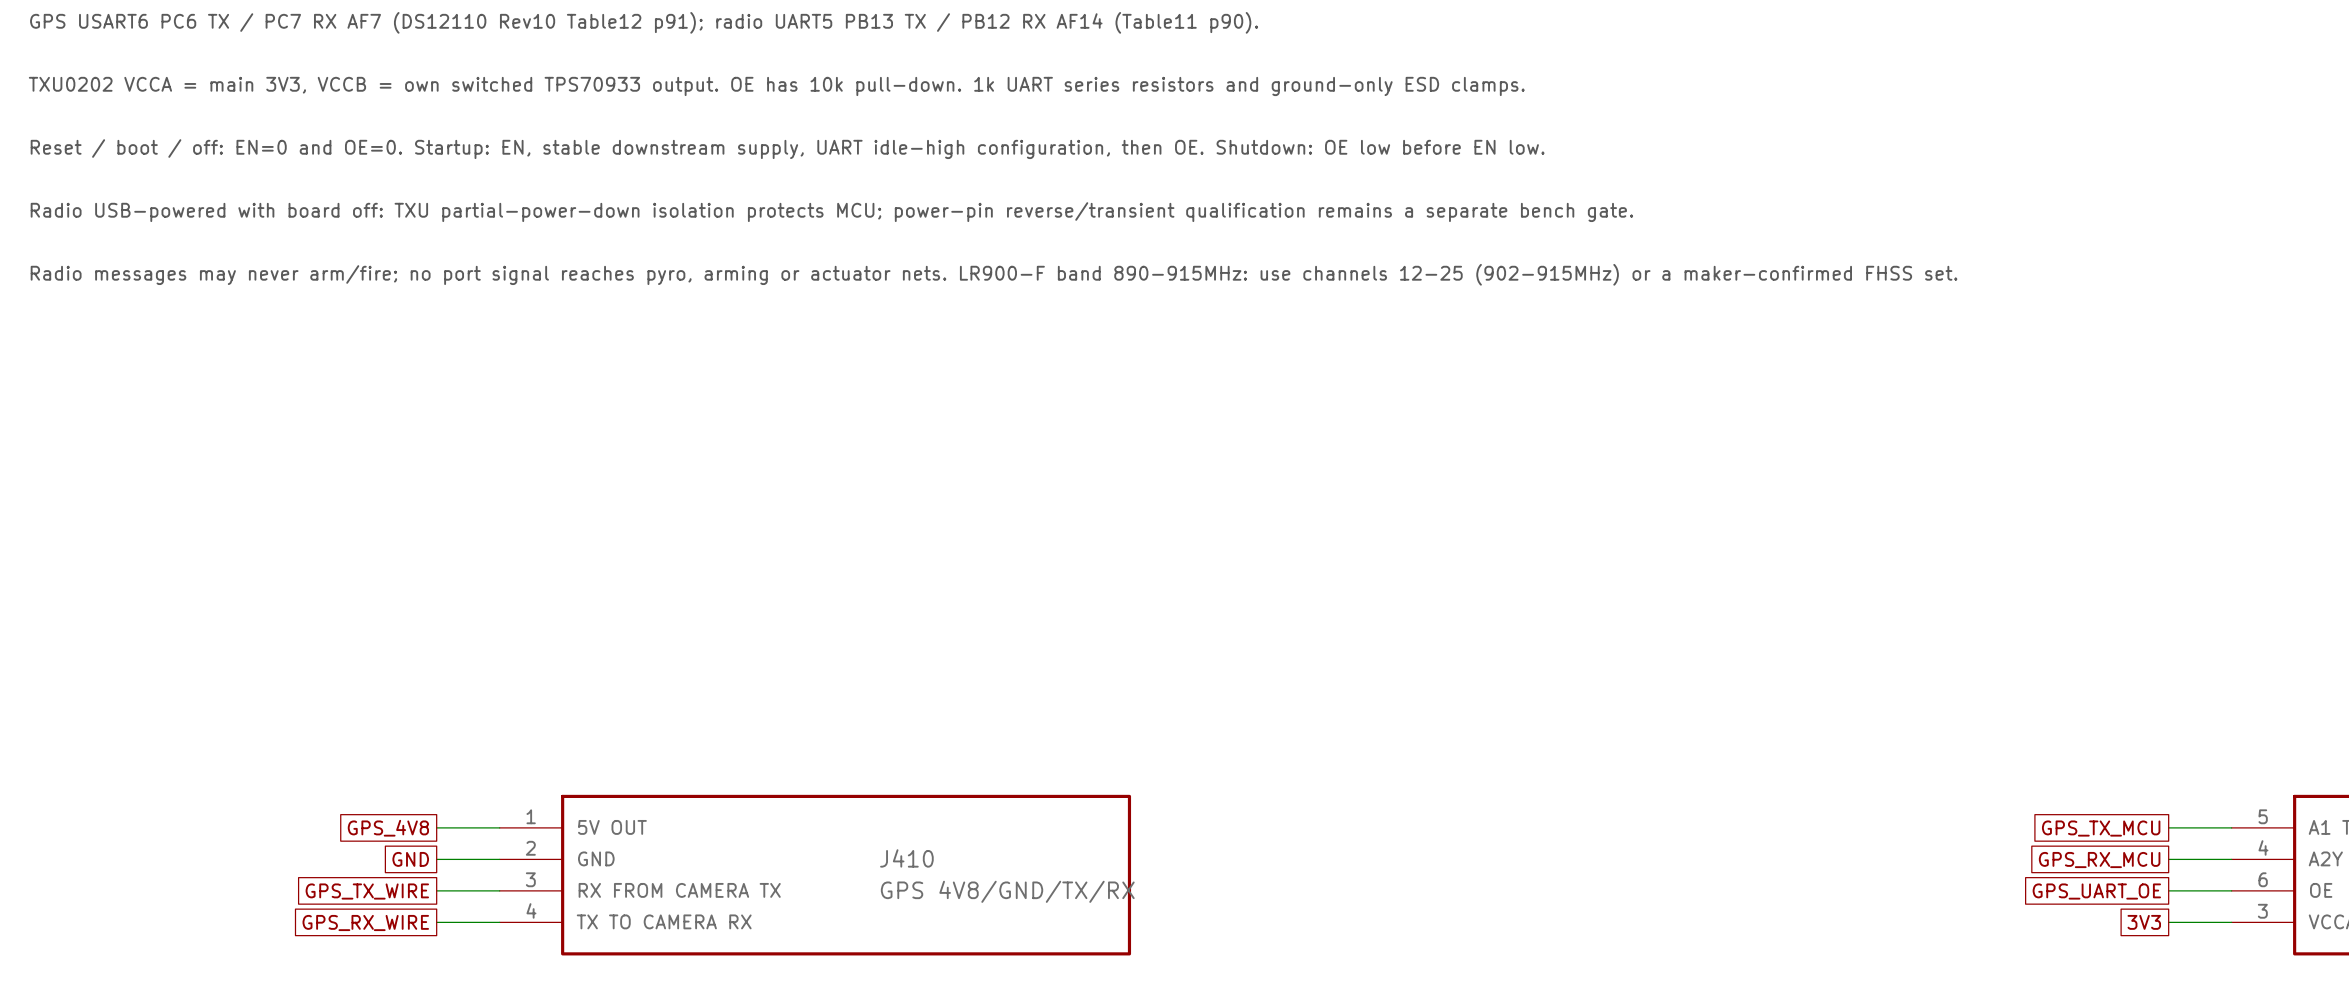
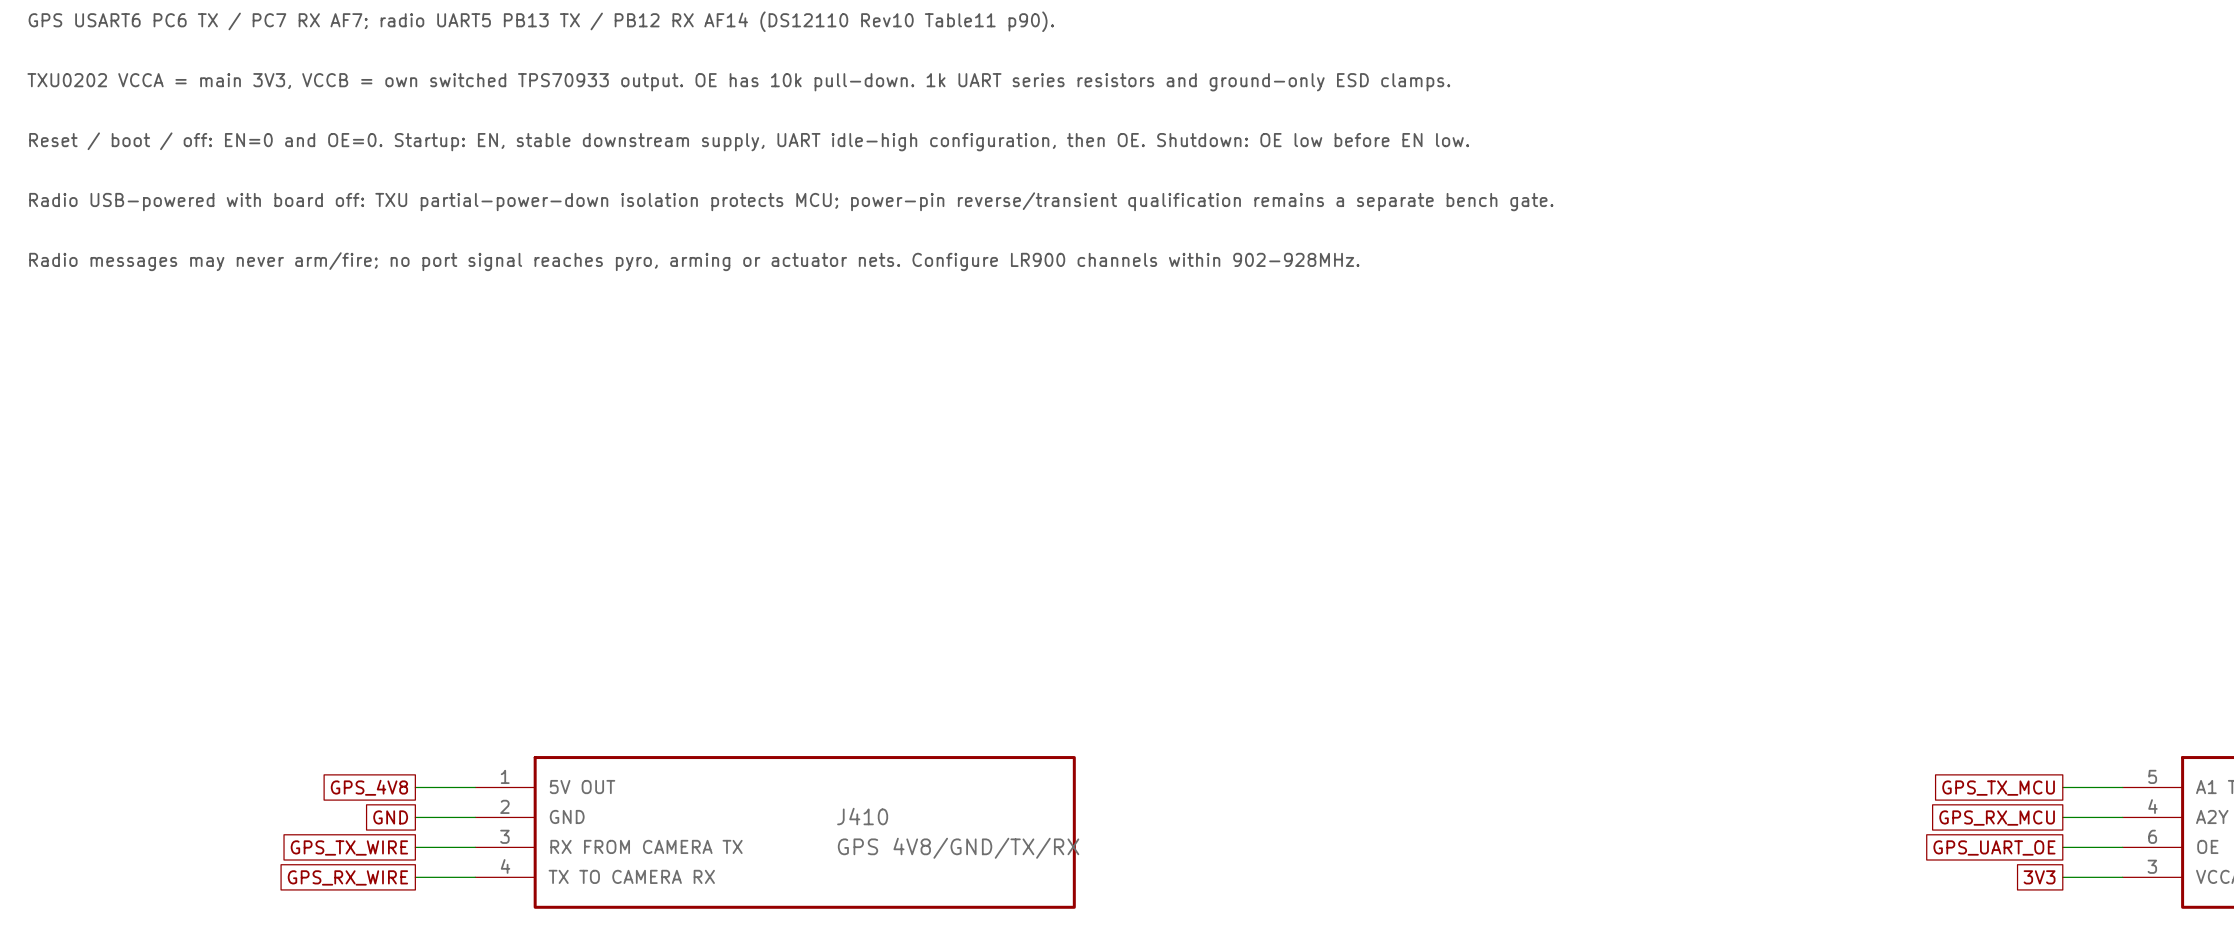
text: GPS USART6 PC6 TX / PC7 RX AF7 (DS12110 Rev10 Table12 p91); radio UART5 PB13 TX / PB12 RX AF14 (Table11 p90). (644, 22) -> GPS USART6 PC6 TX / PC7 RX AF7; radio UART5 PB13 TX / PB12 RX AF14 (DS12110 Rev10 Table11 p90). (541, 21)
text: Radio messages may never arm/fire; no port signal reaches pyro, arming or actuator nets. LR900-F band 890-915MHz: use channels 12-25 (902-915MHz) or a maker-confirmed FHSS set. (994, 274) -> Radio messages may never arm/fire; no port signal reaches pyro, arming or actuator nets. Configure LR900 channels within 902-928MHz. (694, 261)

